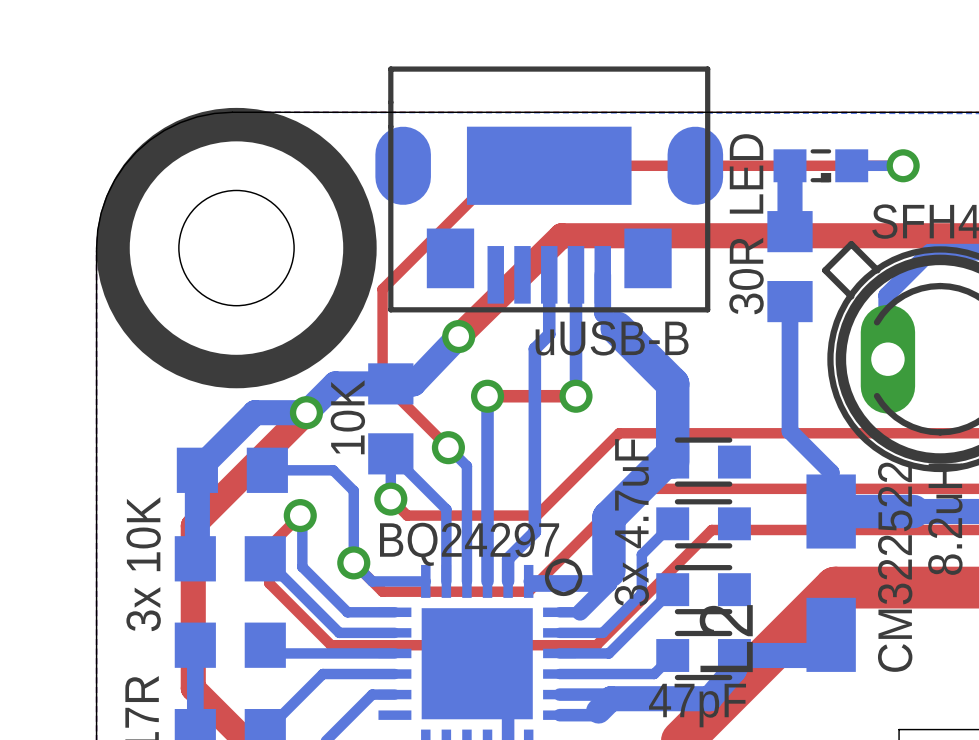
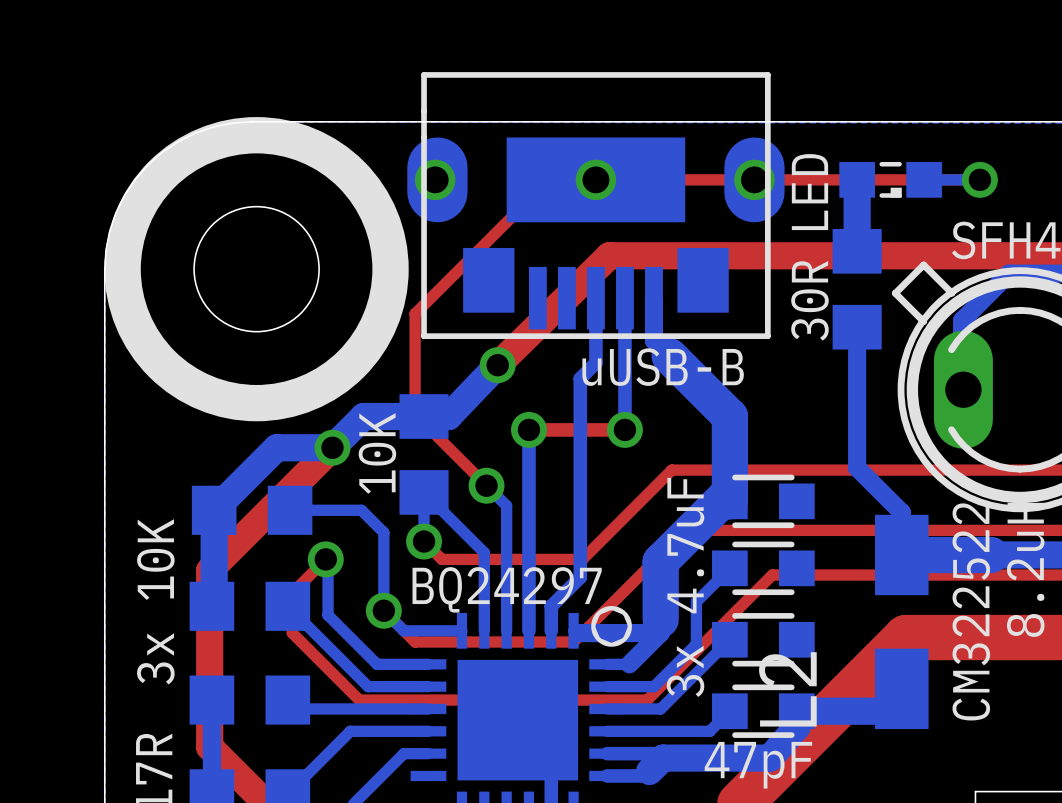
via: none -> (435, 179)
via: none -> (595, 179)
via: none -> (754, 179)

